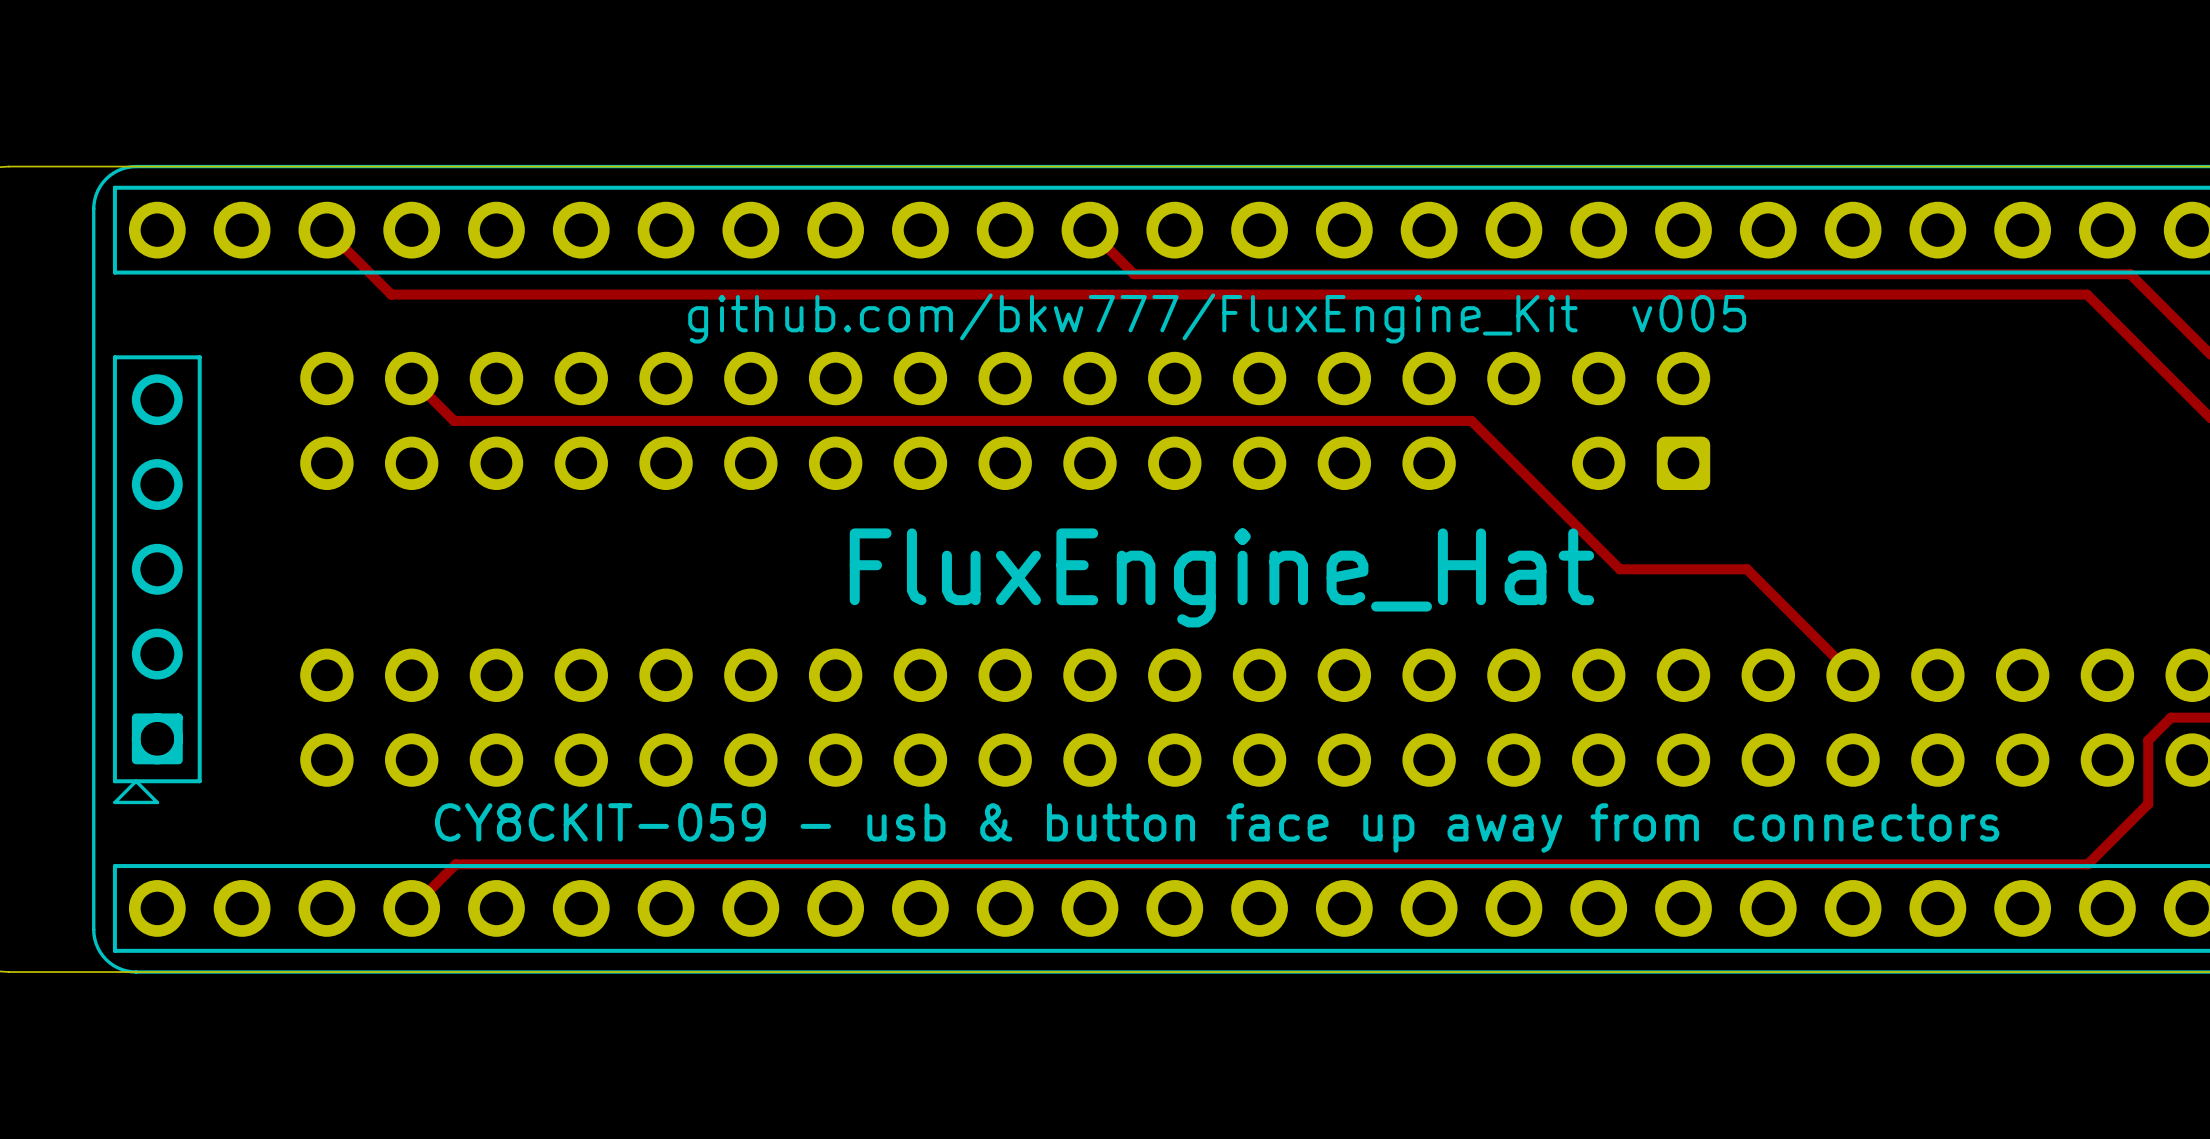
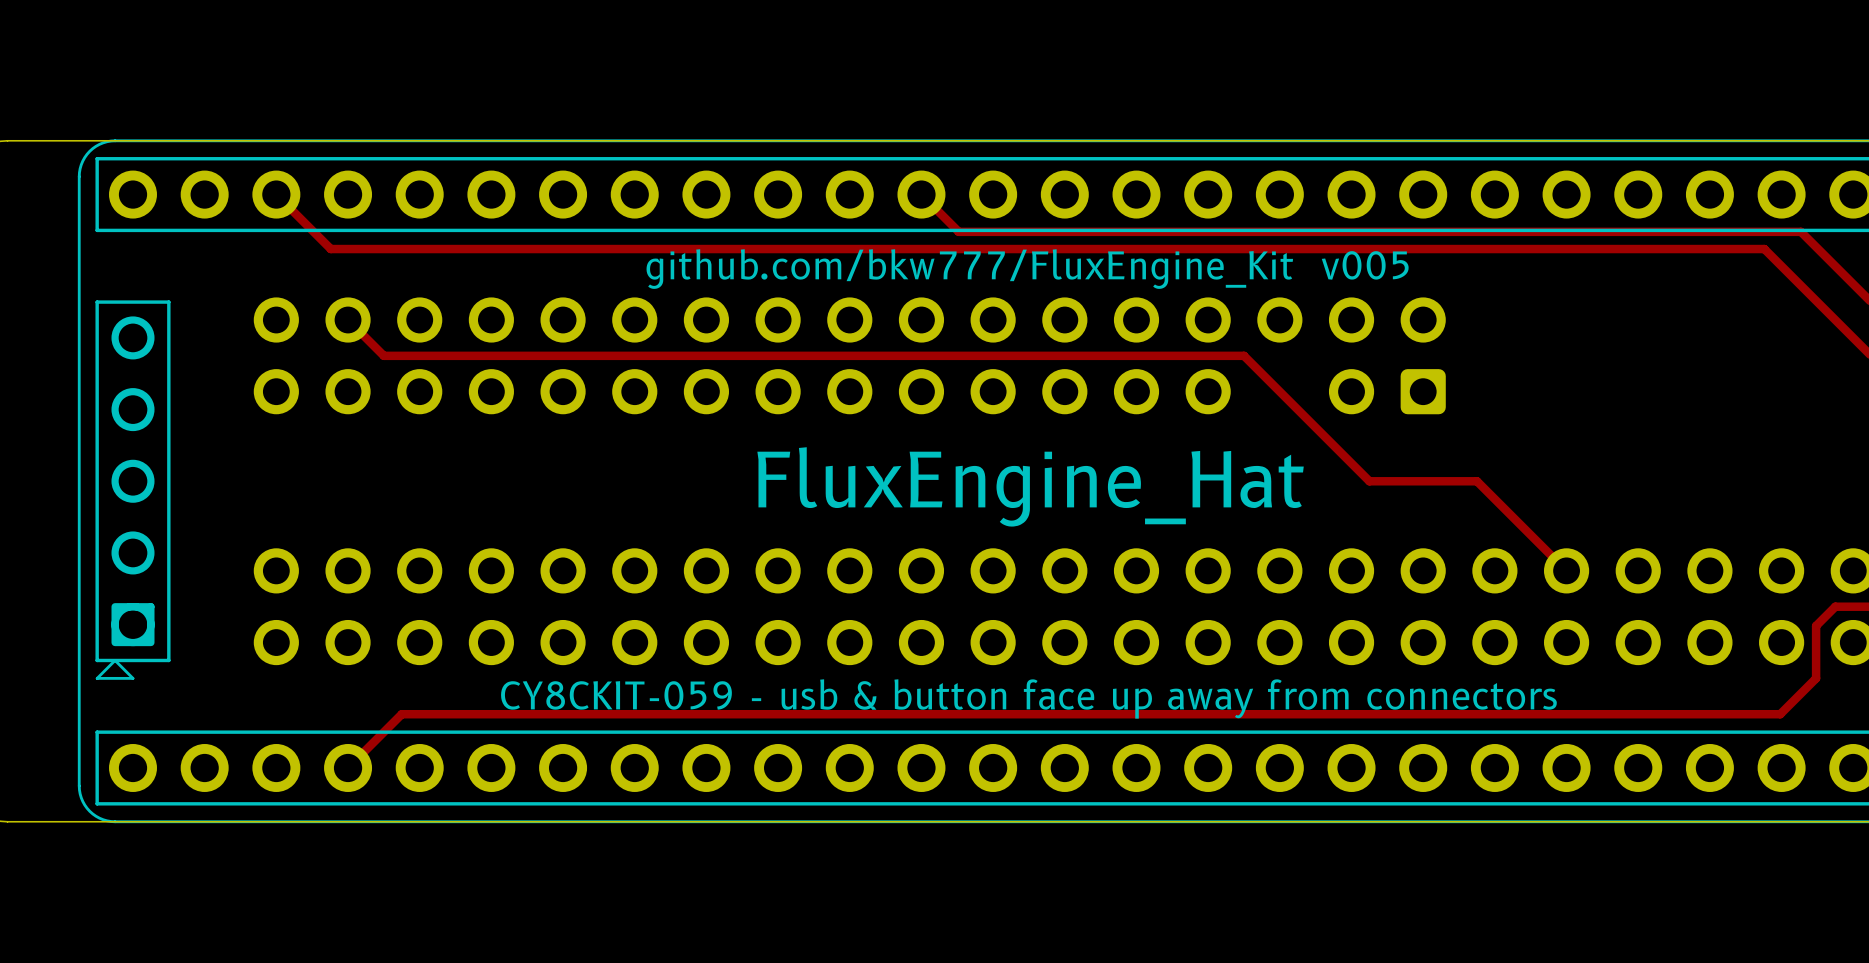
track: (2148, 802) (2087, 864) (455, 864) -> (1816, 678) (1780, 714) (401, 714) (385, 730)

